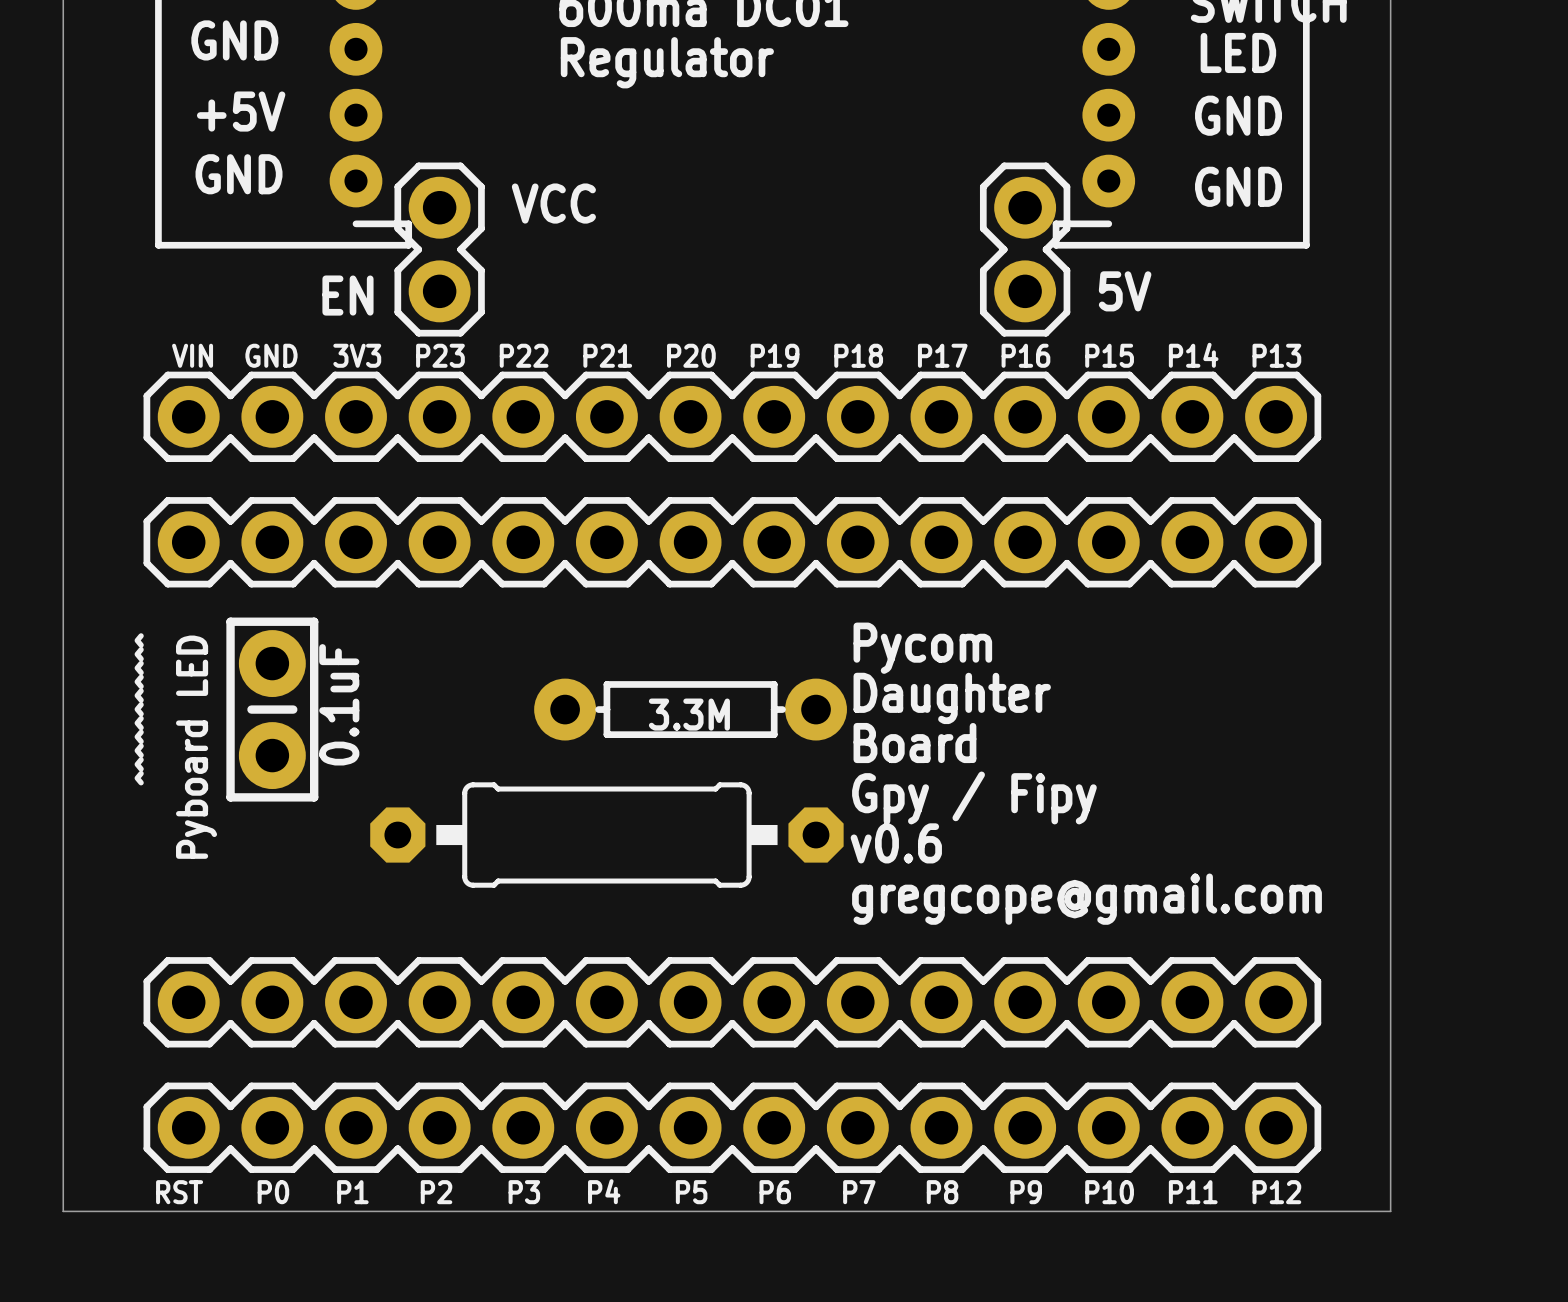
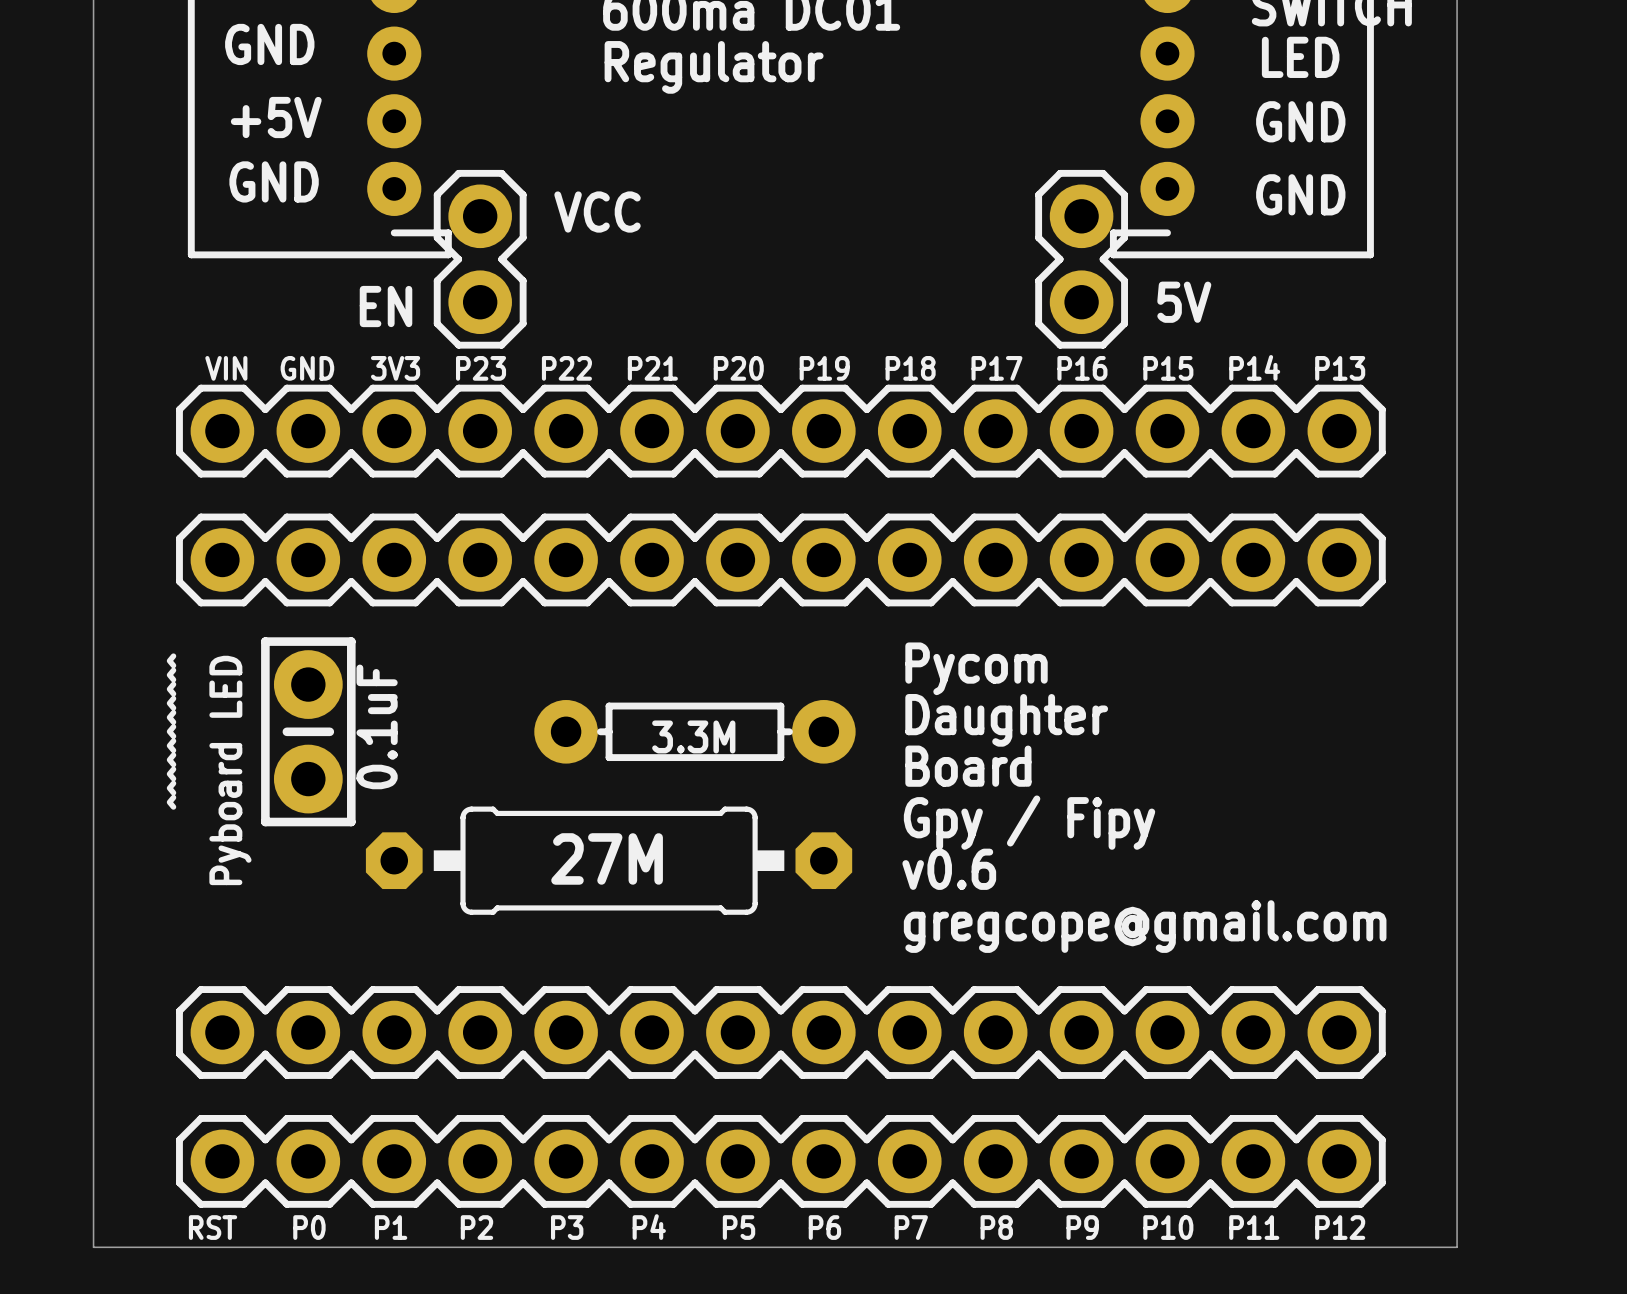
part position: (690, 709) -> (694, 731)
part: none -> 27M (609, 860)
part: (606, 835) -> none

